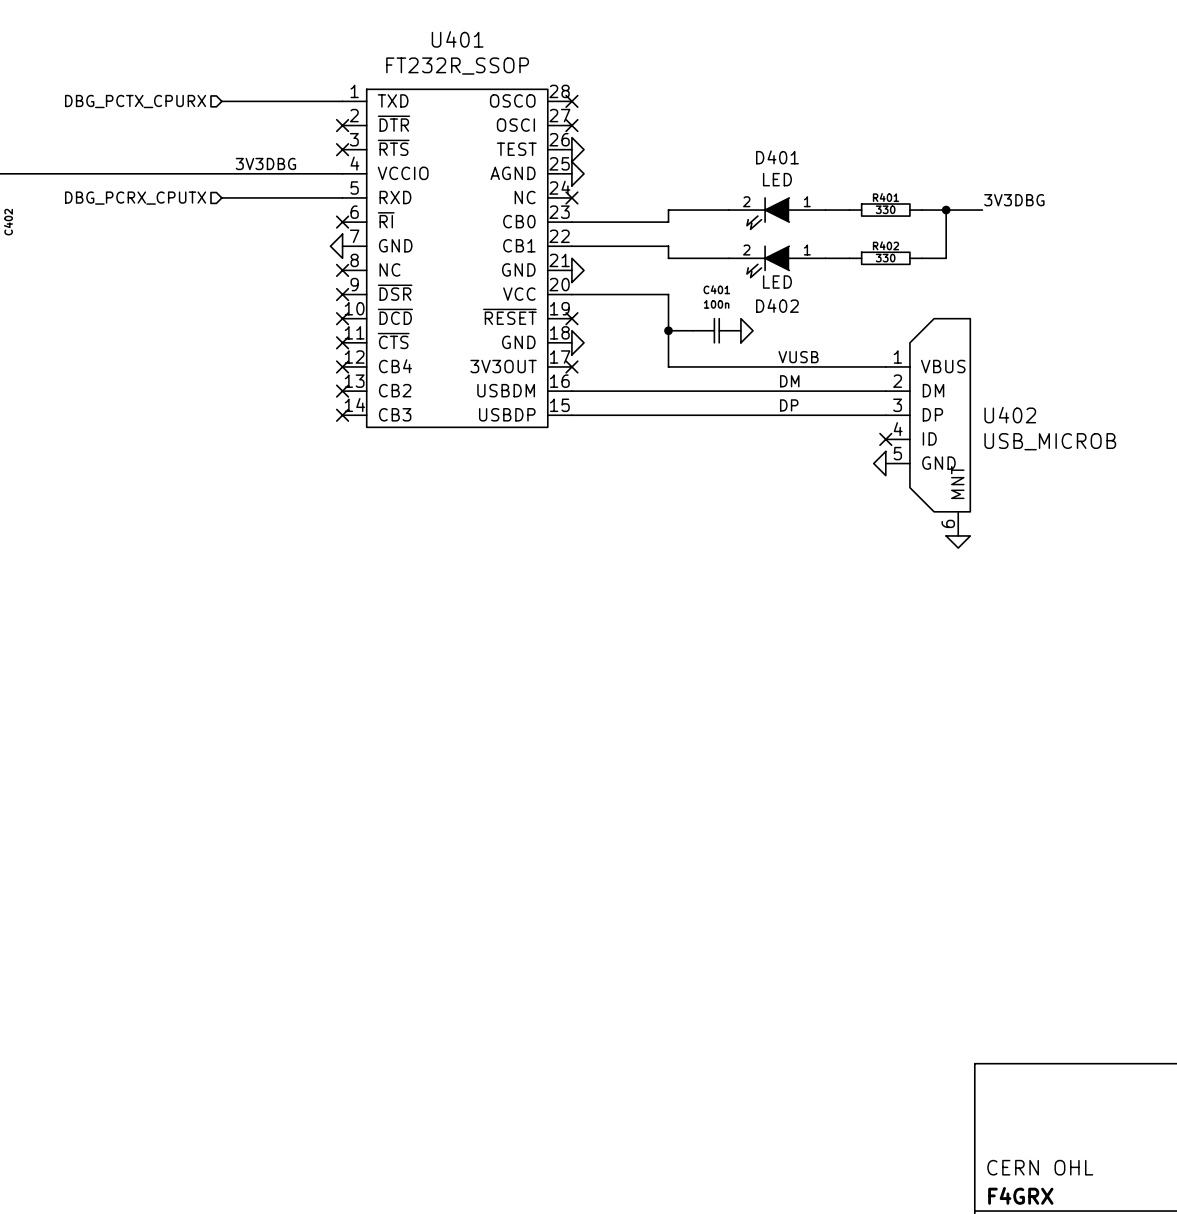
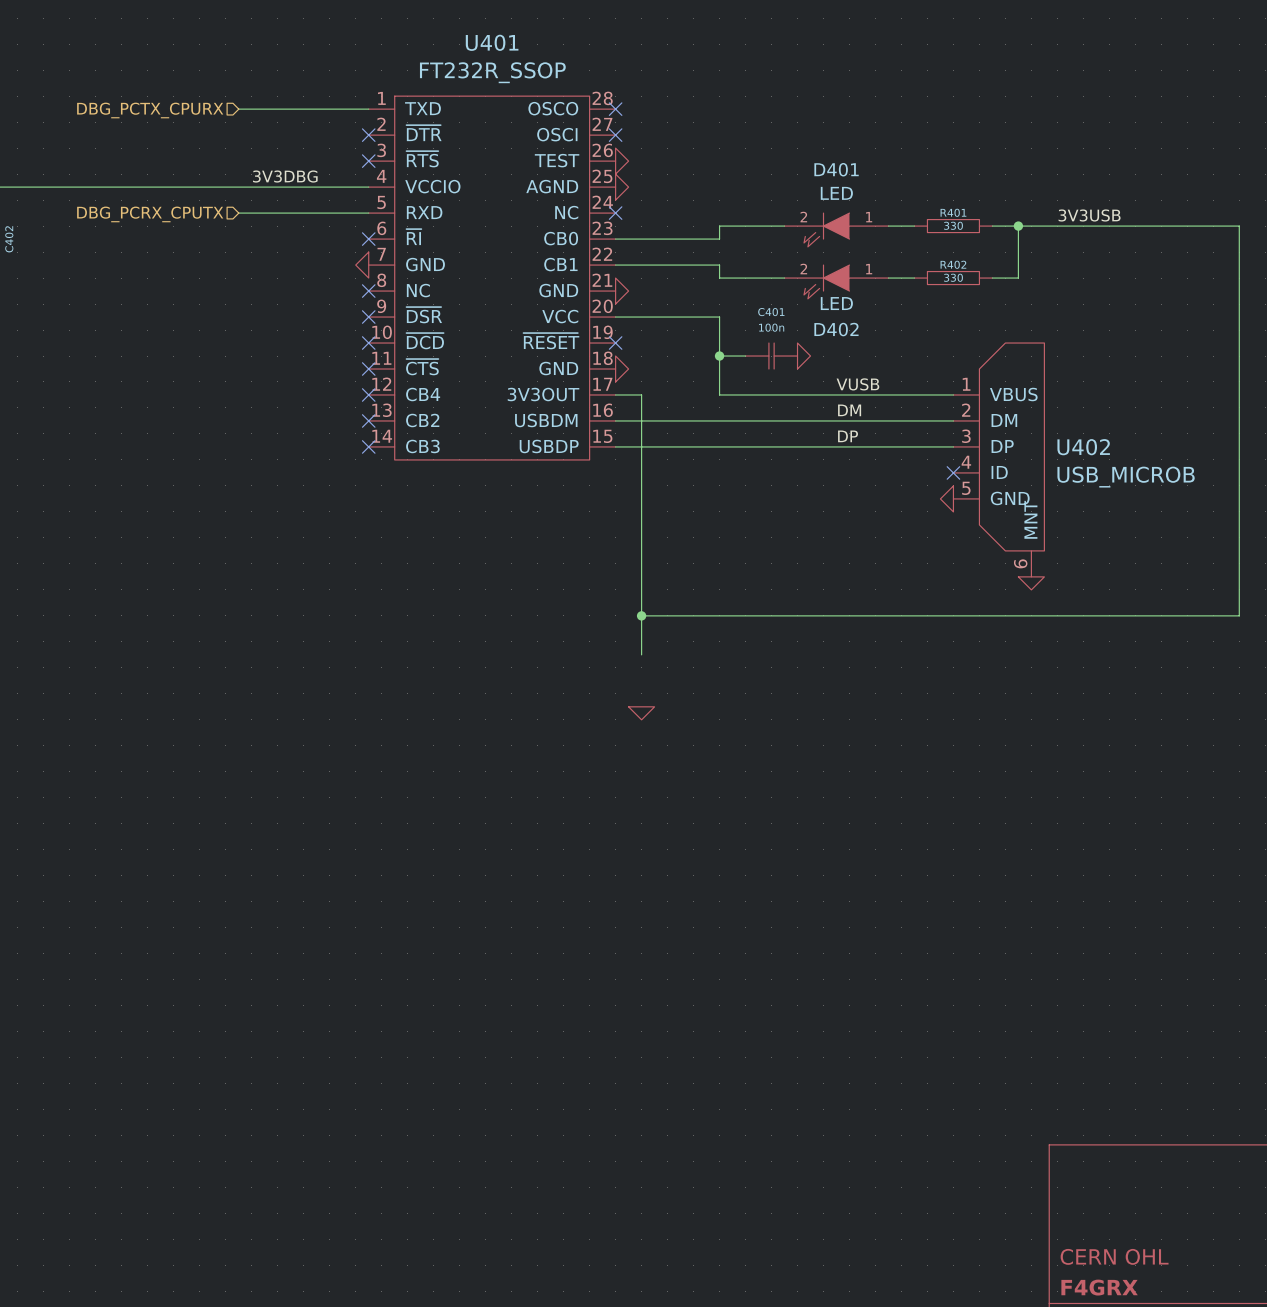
label: 3V3DBG (1014, 200) -> 3V3USB (1089, 215)
wire: none -> (1057, 226) (1239, 226) (1239, 615) (641, 615)
wire: none -> (615, 394) (641, 394) (641, 654)
no-connect mark: (571, 366) -> none
junction: none -> (641, 615)
power symbol: none -> (641, 713)

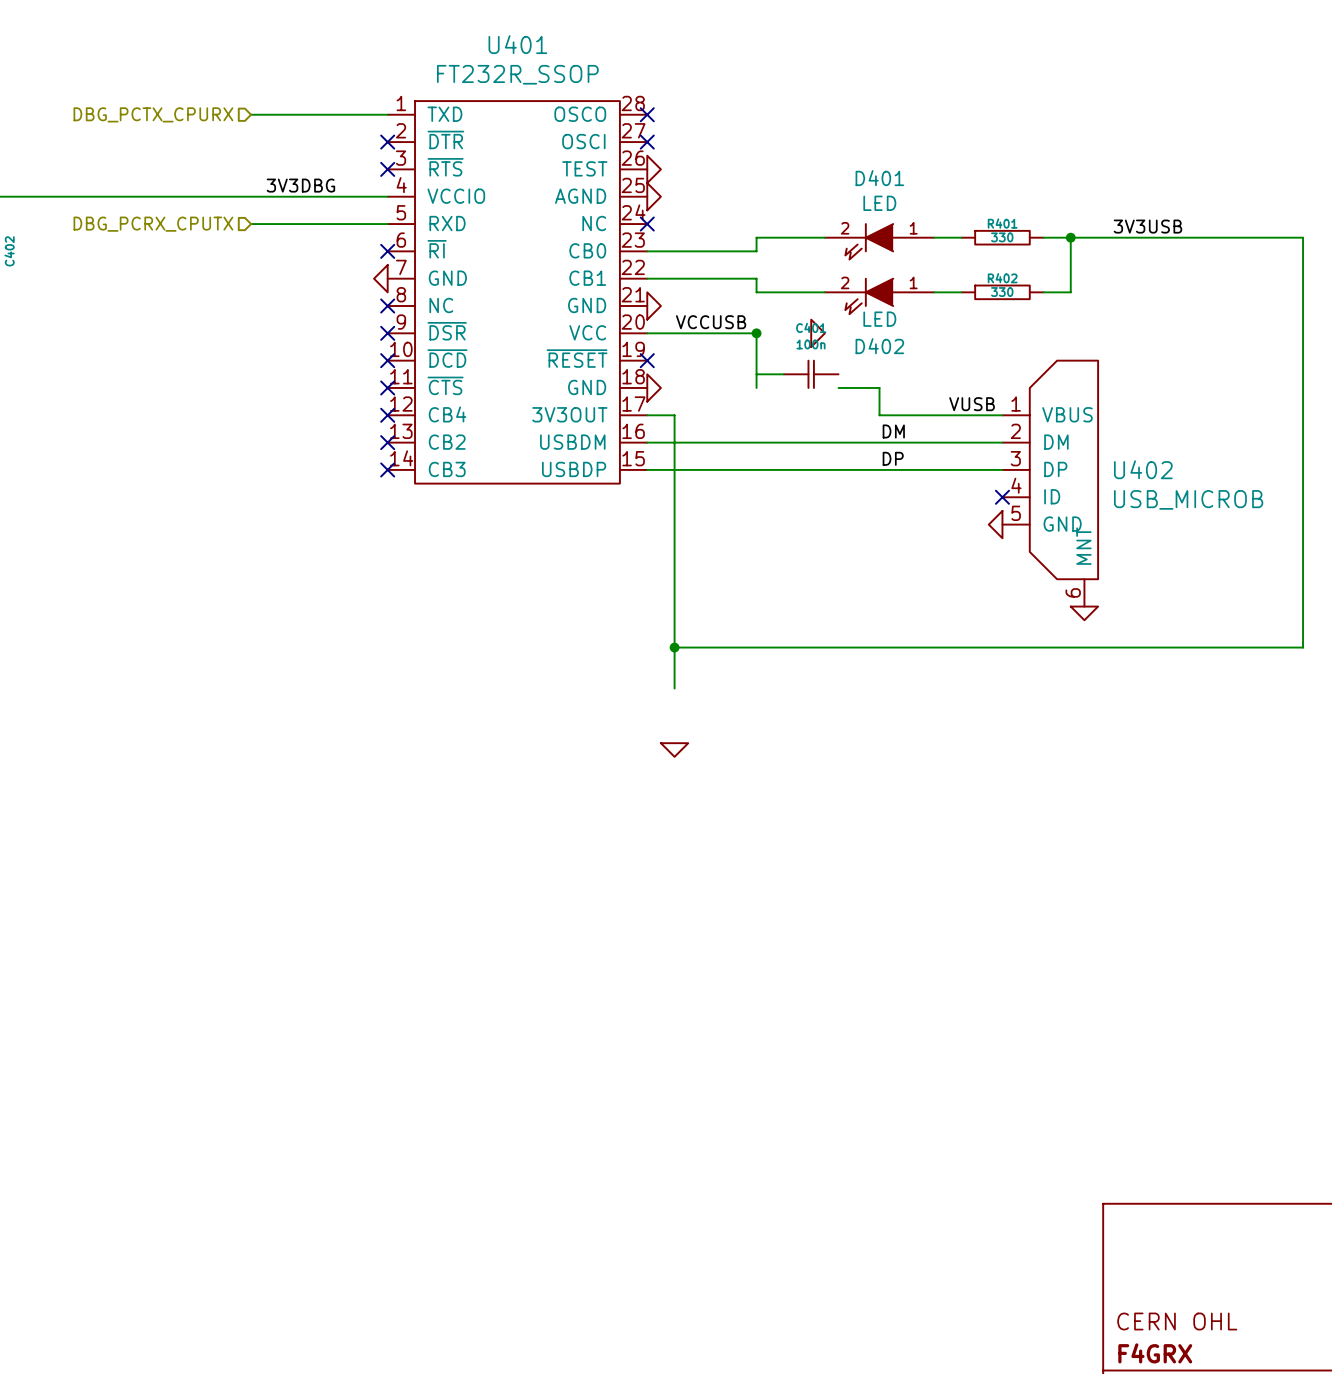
label: none -> VCCUSB (711, 322)
junction position: (719, 356) -> (756, 333)
power symbol position: (804, 356) -> (818, 333)
wire: (719, 369) (719, 394) (836, 394) -> (838, 387) (879, 387) (879, 415)
label position: VUSB (857, 384) -> VUSB (972, 404)

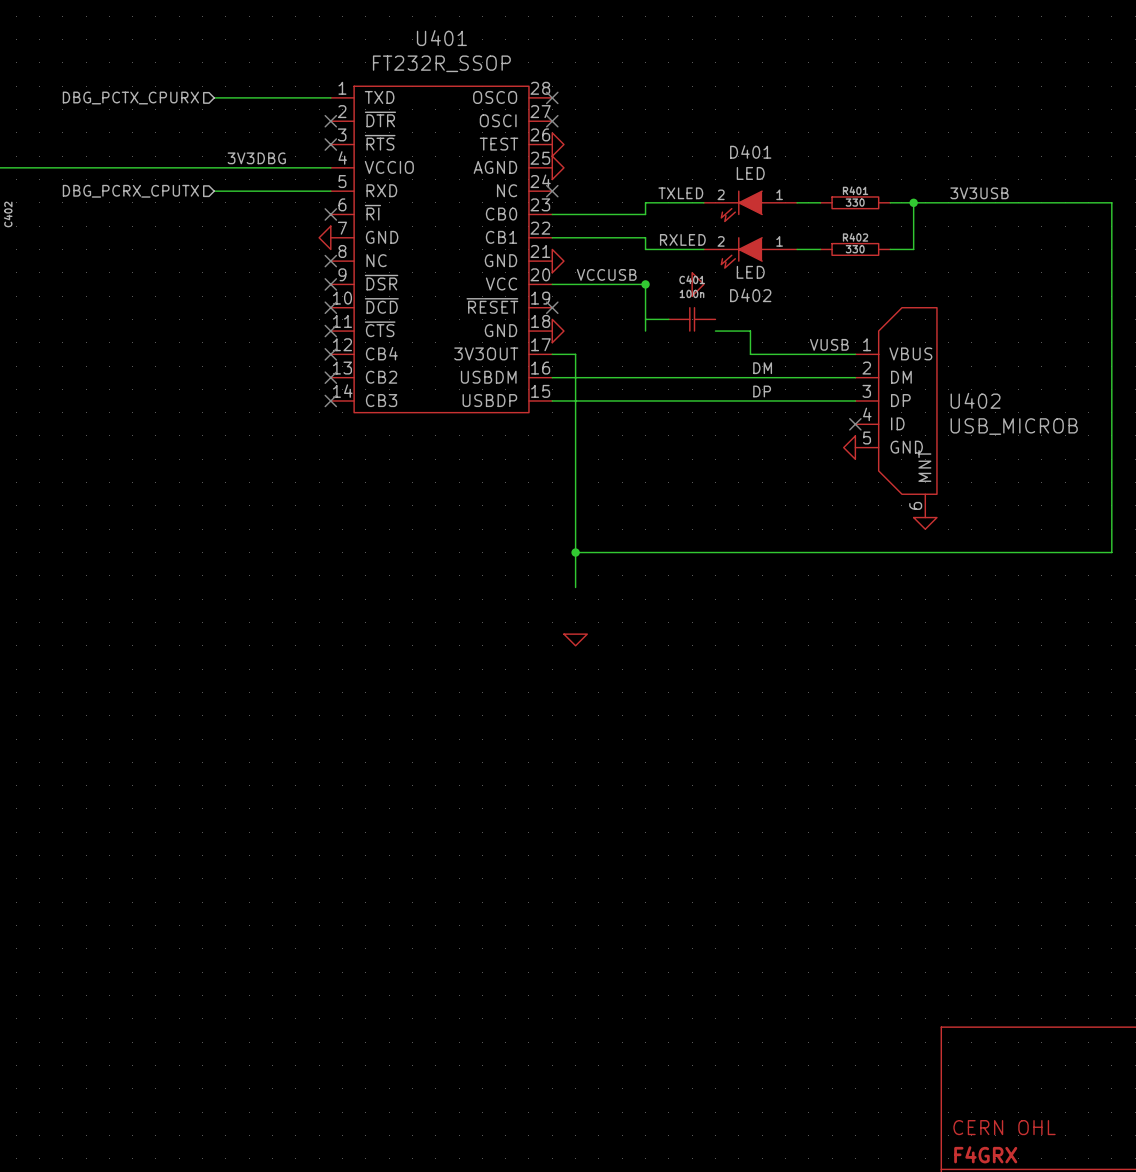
label: none -> TXLED (680, 193)
label: none -> RXLED (682, 239)

